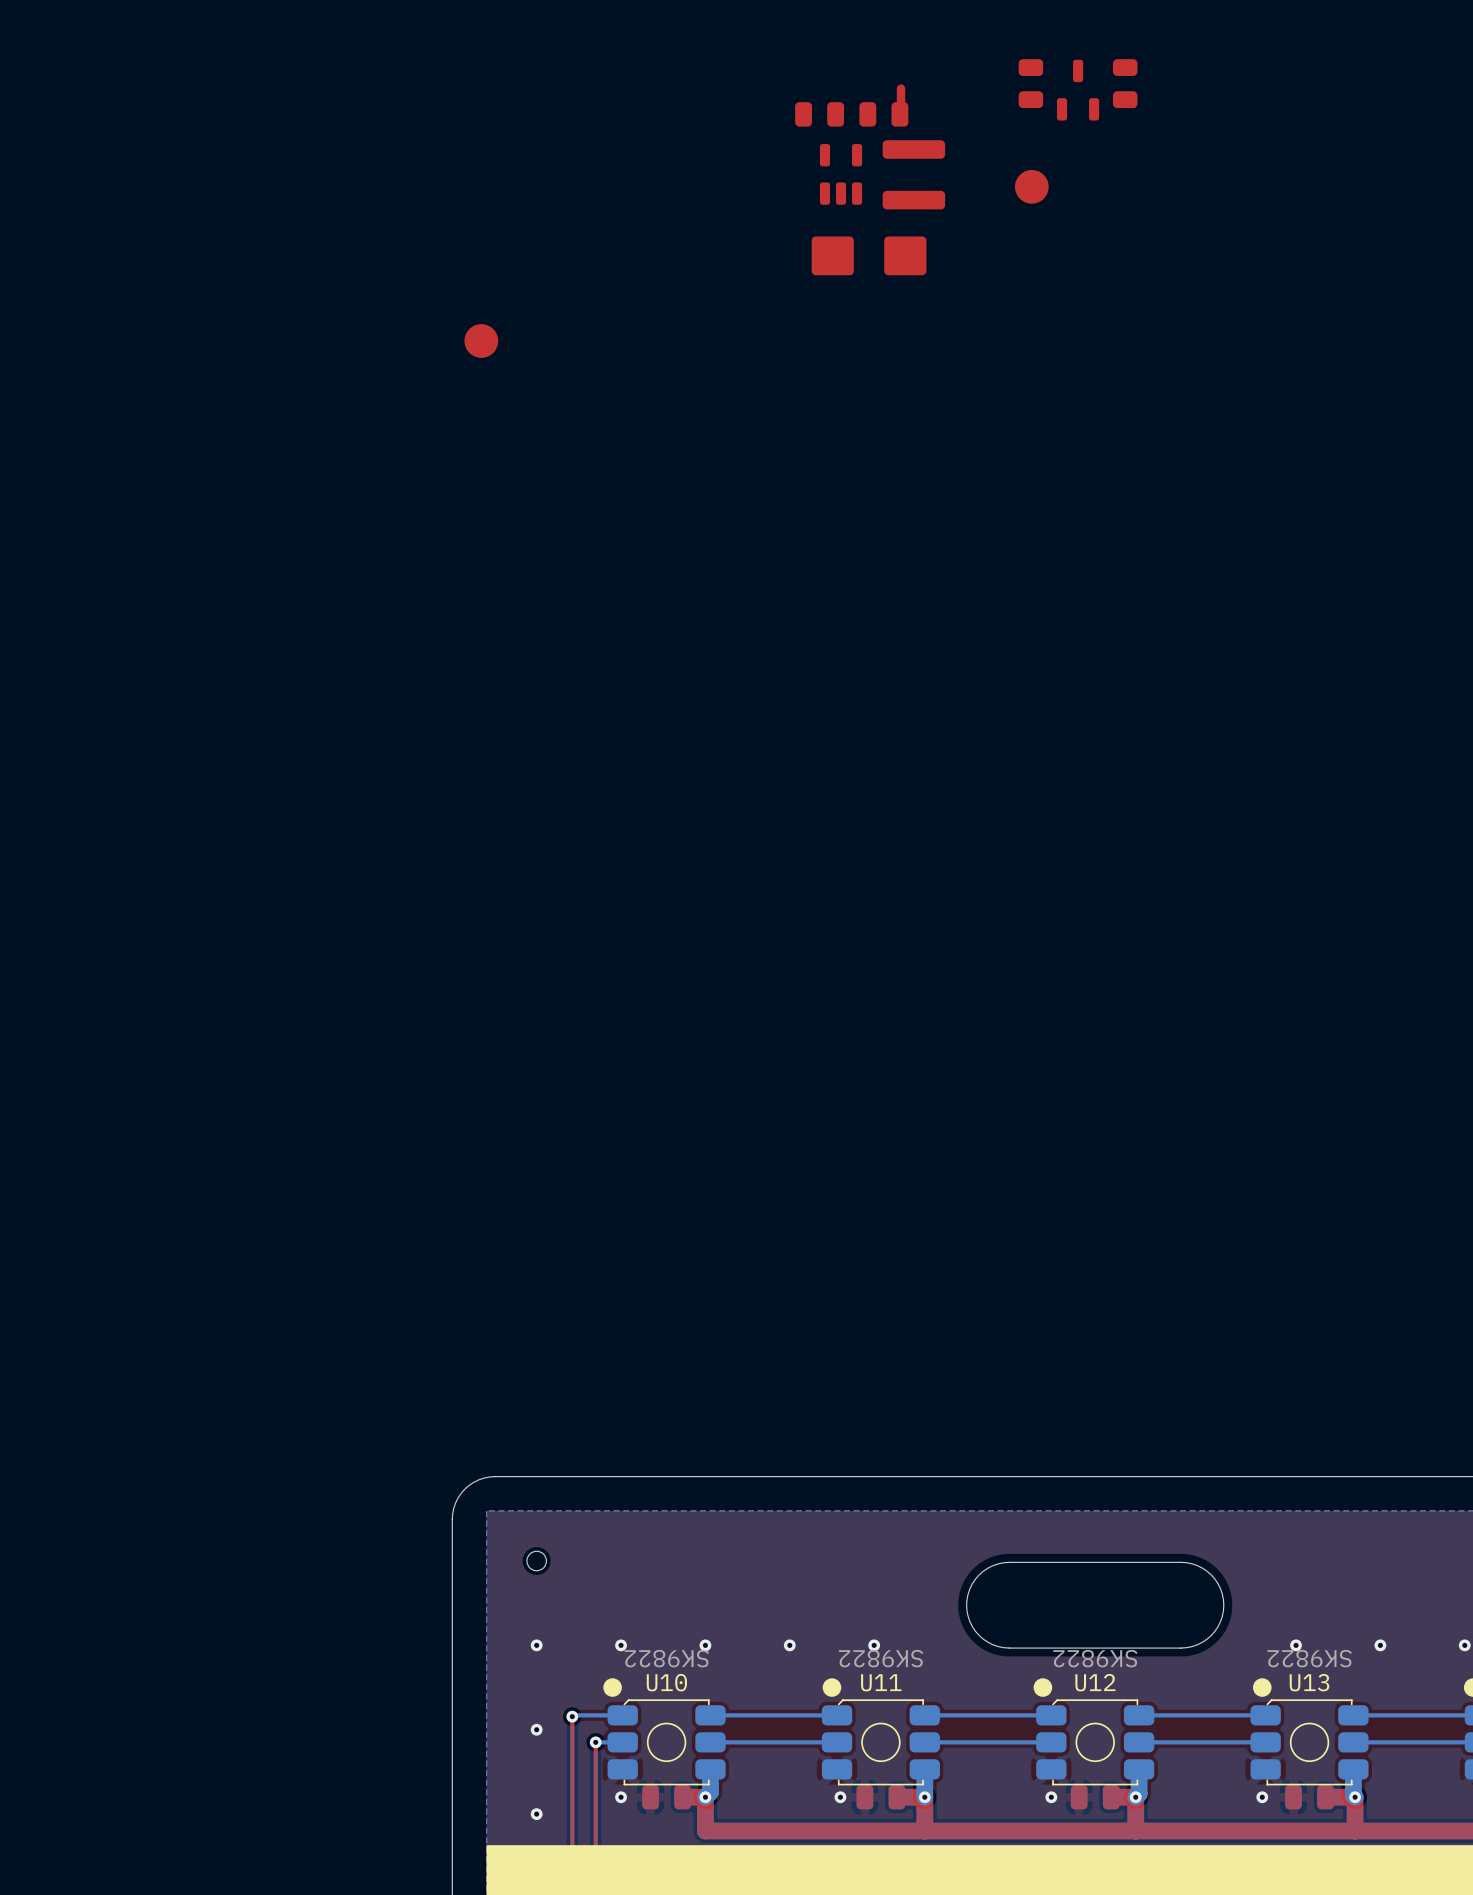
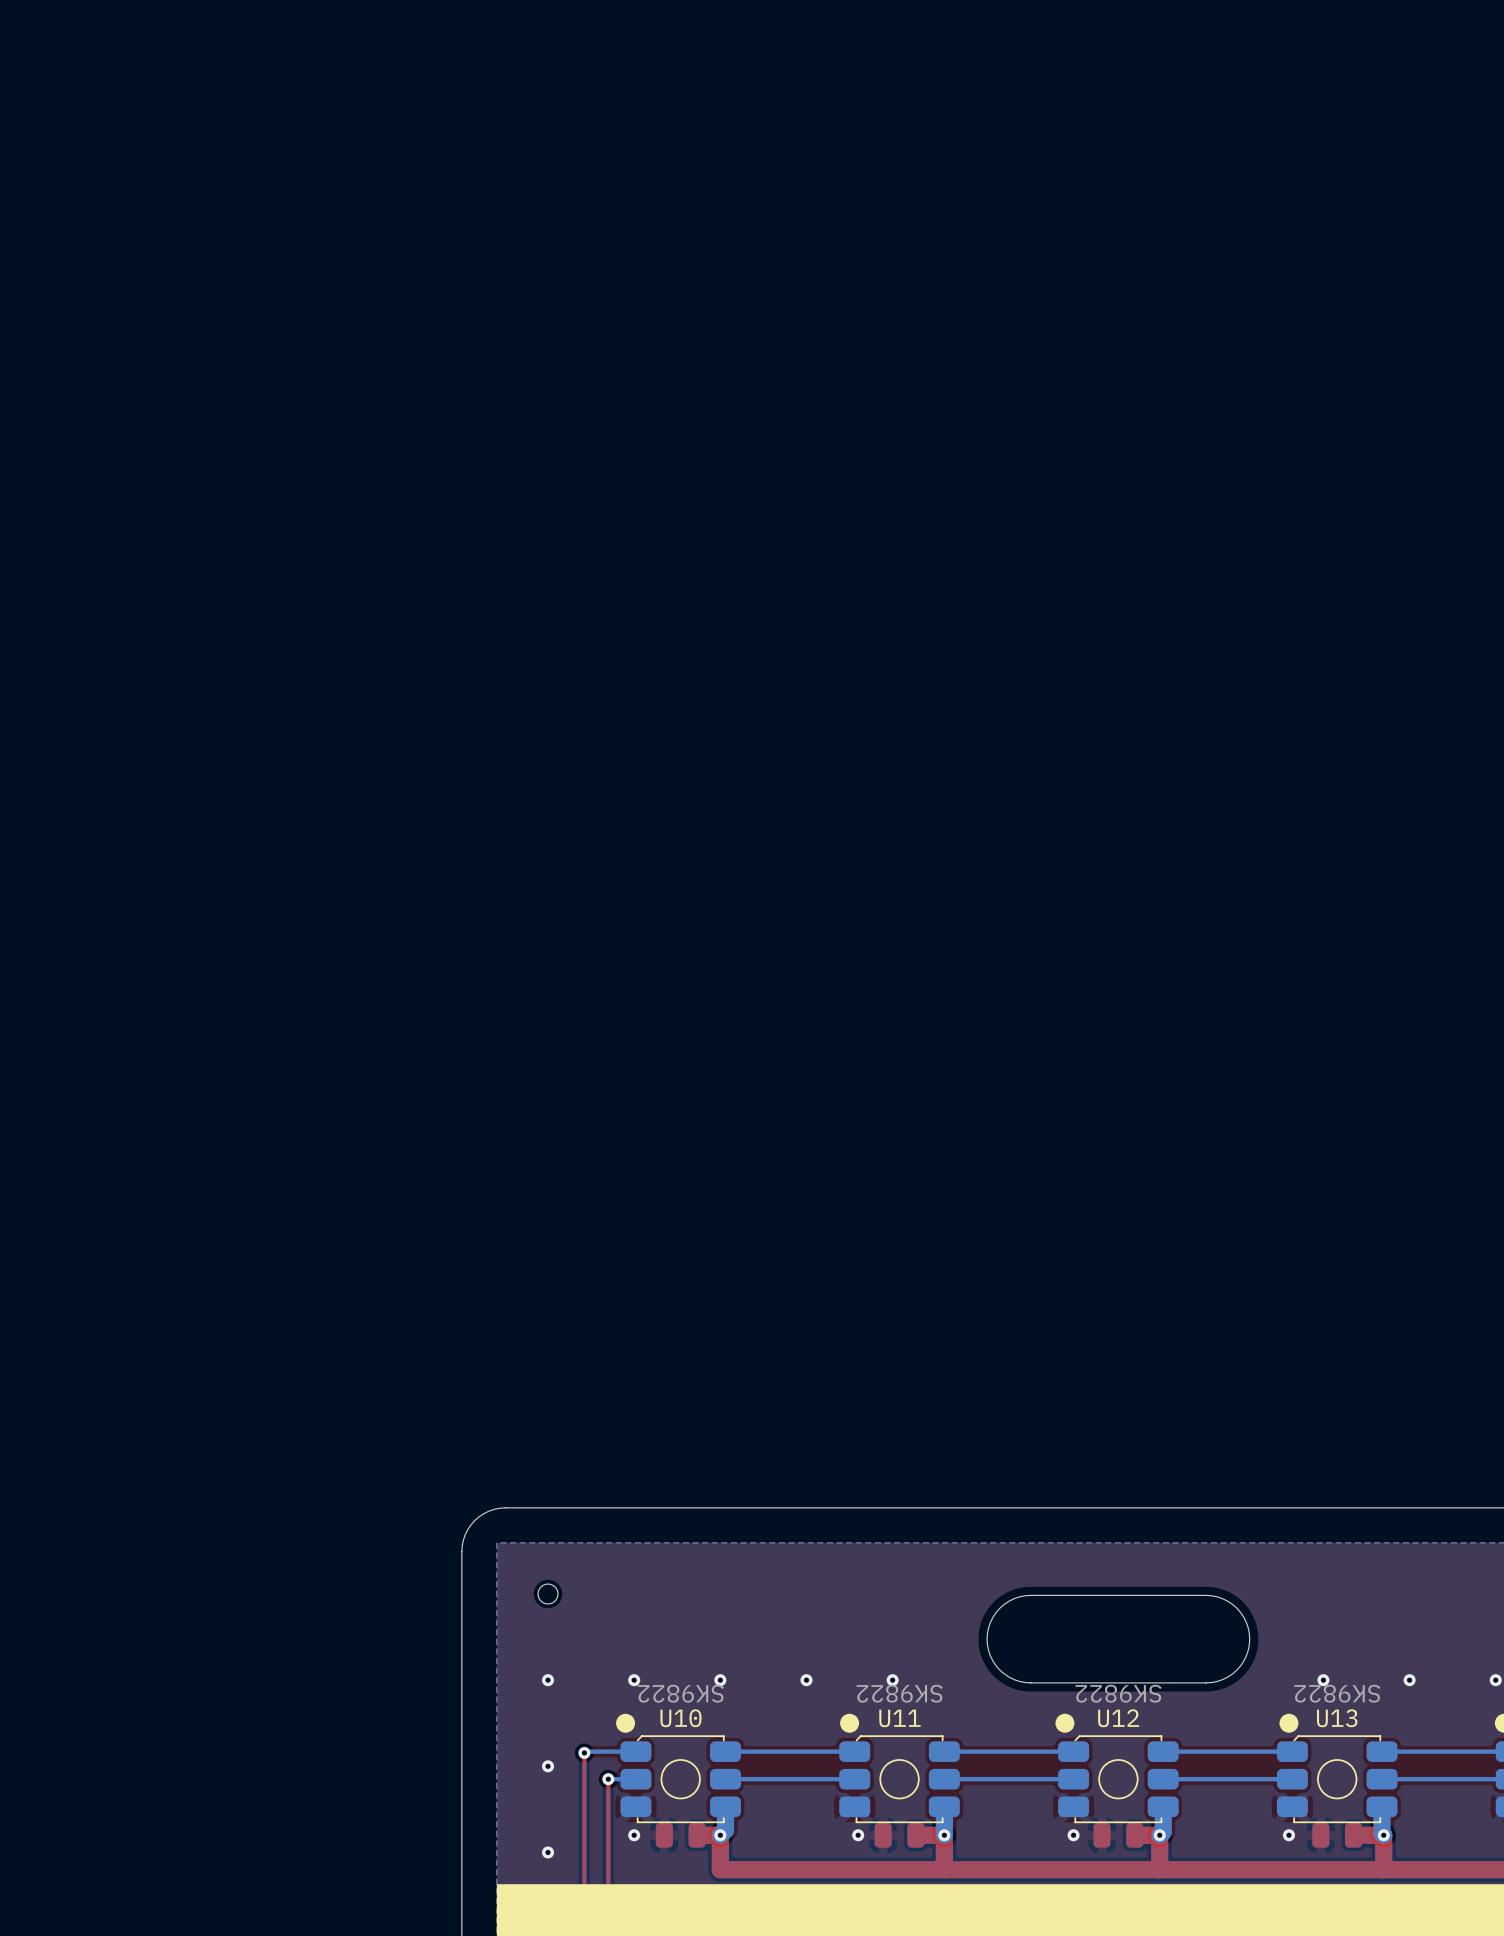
part: (1030, 83) -> none
part: (1125, 83) -> none
part: (1078, 90) -> none
part: (901, 97) -> none
part: (819, 114) -> none
part: (883, 114) -> none
part: (841, 174) -> none
part: (913, 174) -> none
part: (1031, 186) -> none
part: (869, 255) -> none
part: (481, 340) -> none

